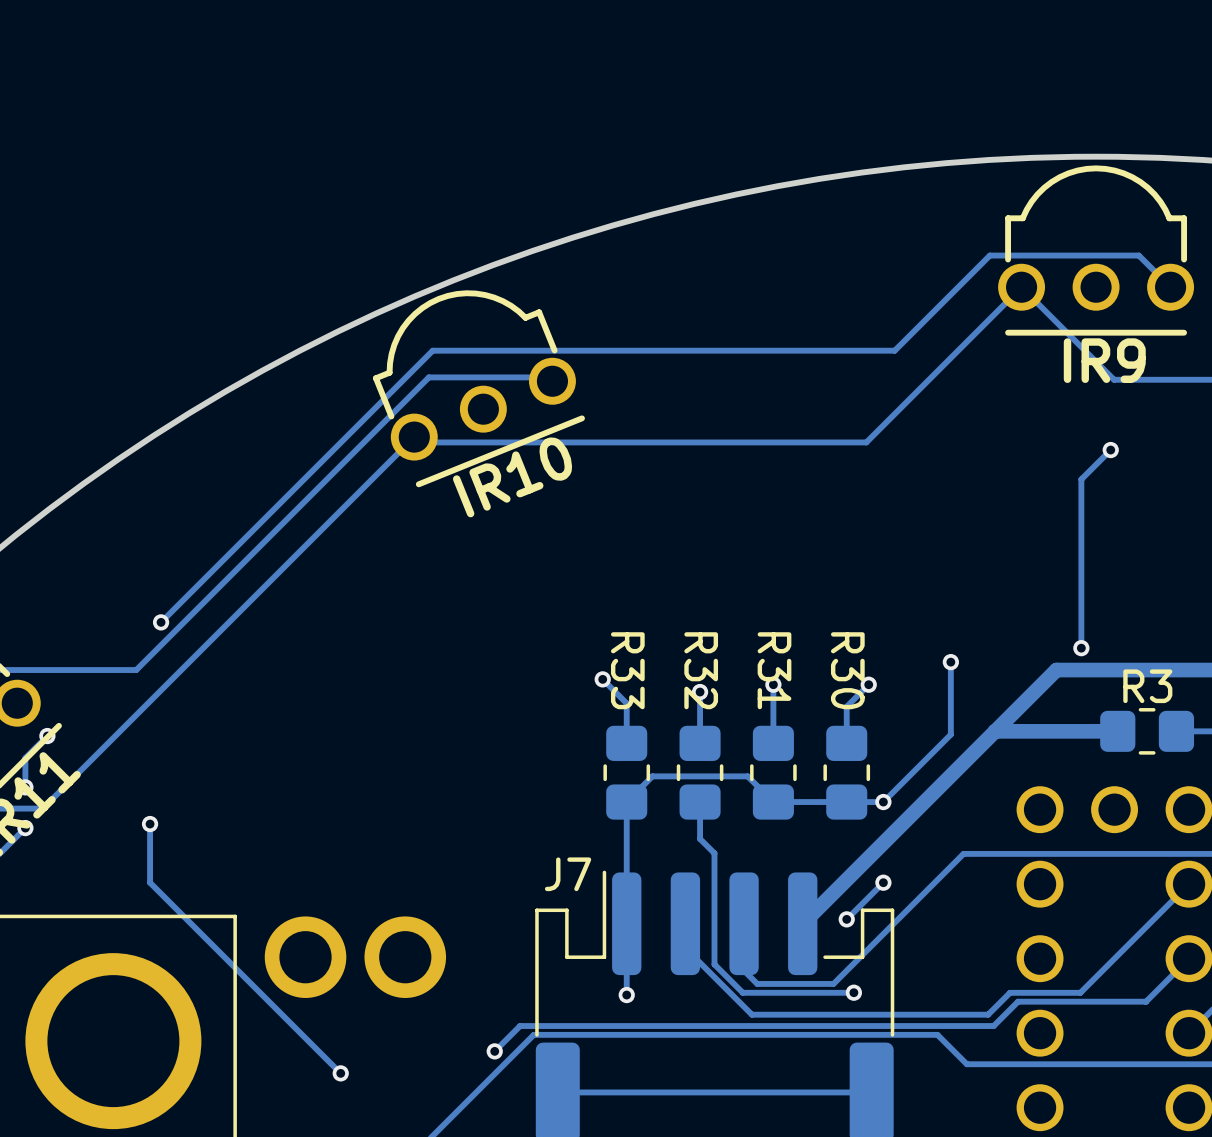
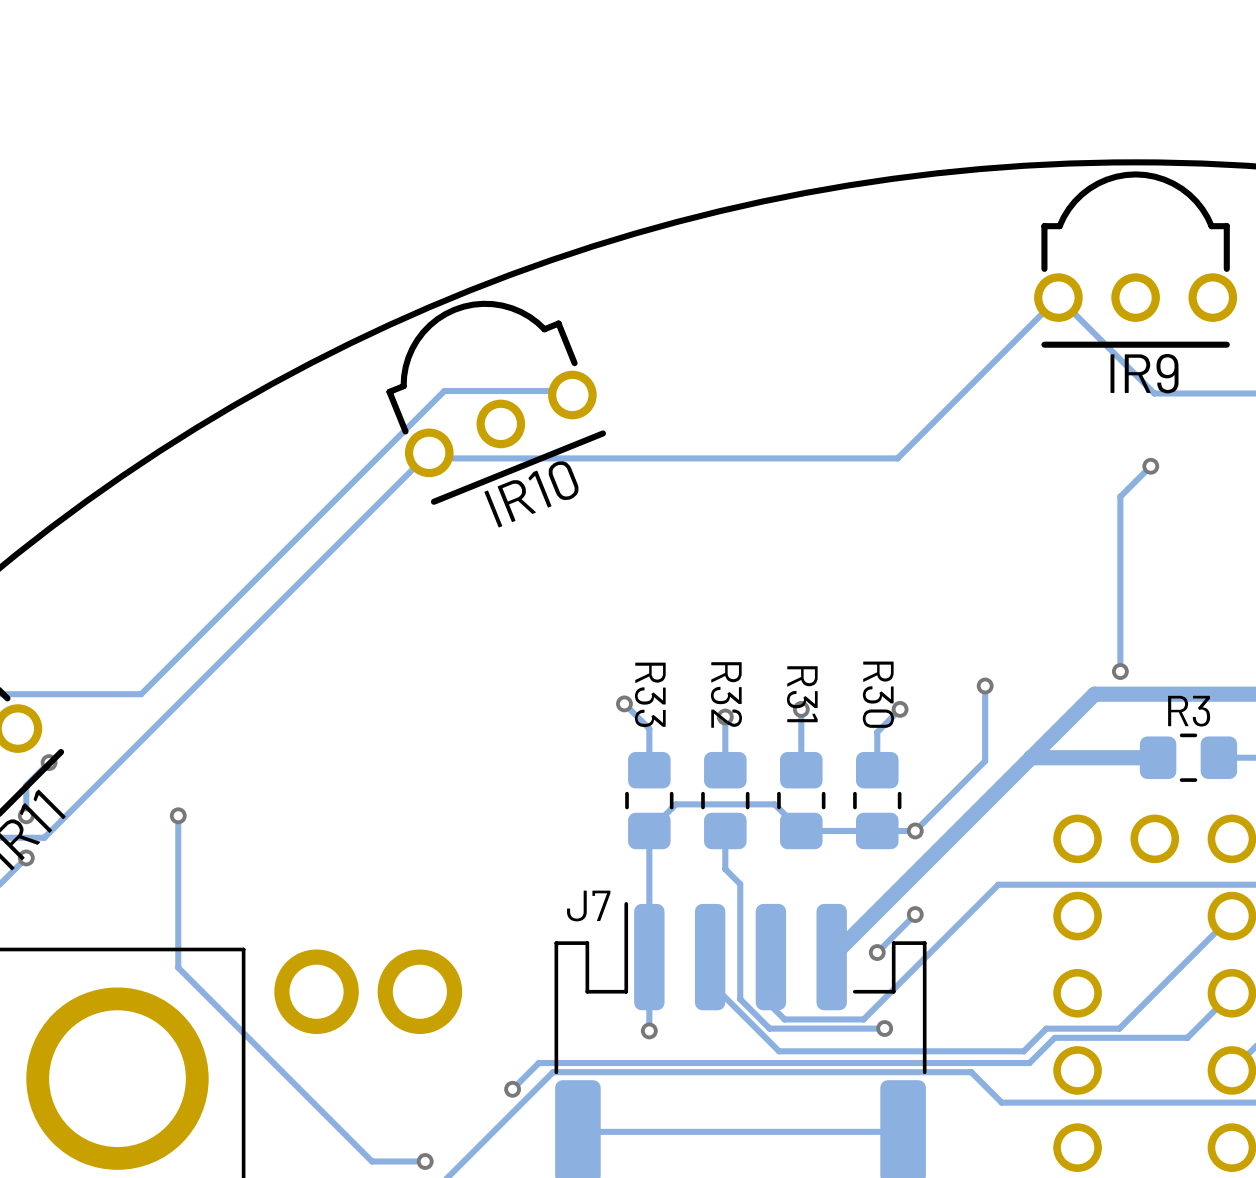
track: (1170, 287) (1138, 255) (989, 255) (894, 350) (432, 350) (161, 622) -> none
via: (161, 622) -> none
track: none -> (178, 815) (178, 967) (372, 1161) (425, 1161)
track: (150, 824) (150, 882) (340, 1073) -> none
via position: (150, 824) -> (178, 815)
via position: (340, 1073) -> (425, 1161)

